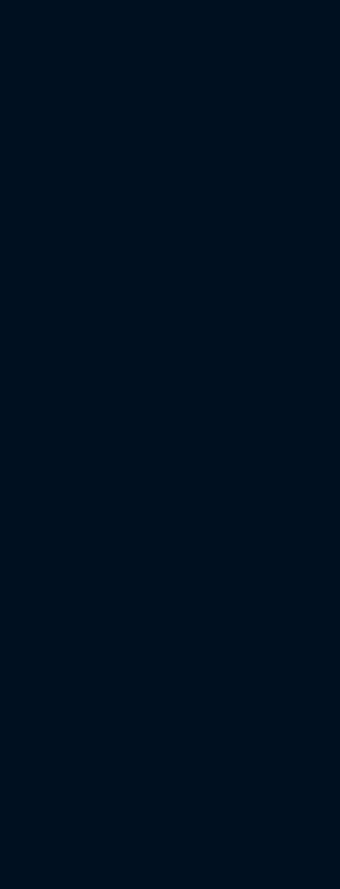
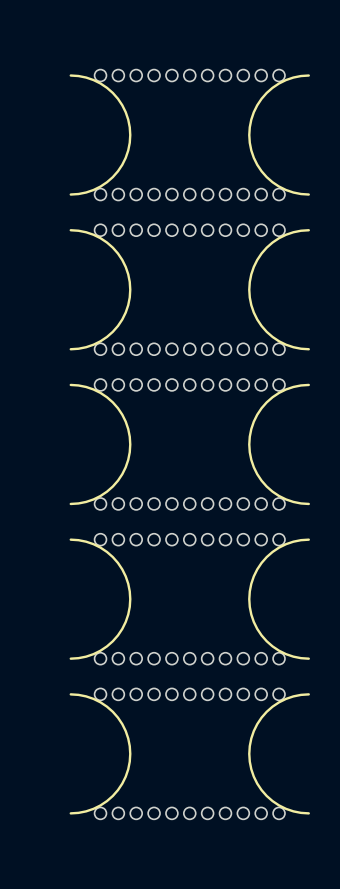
part: none -> (189, 135)
part: none -> (189, 289)
part: none -> (189, 444)
part: none -> (189, 599)
part: none -> (189, 753)

